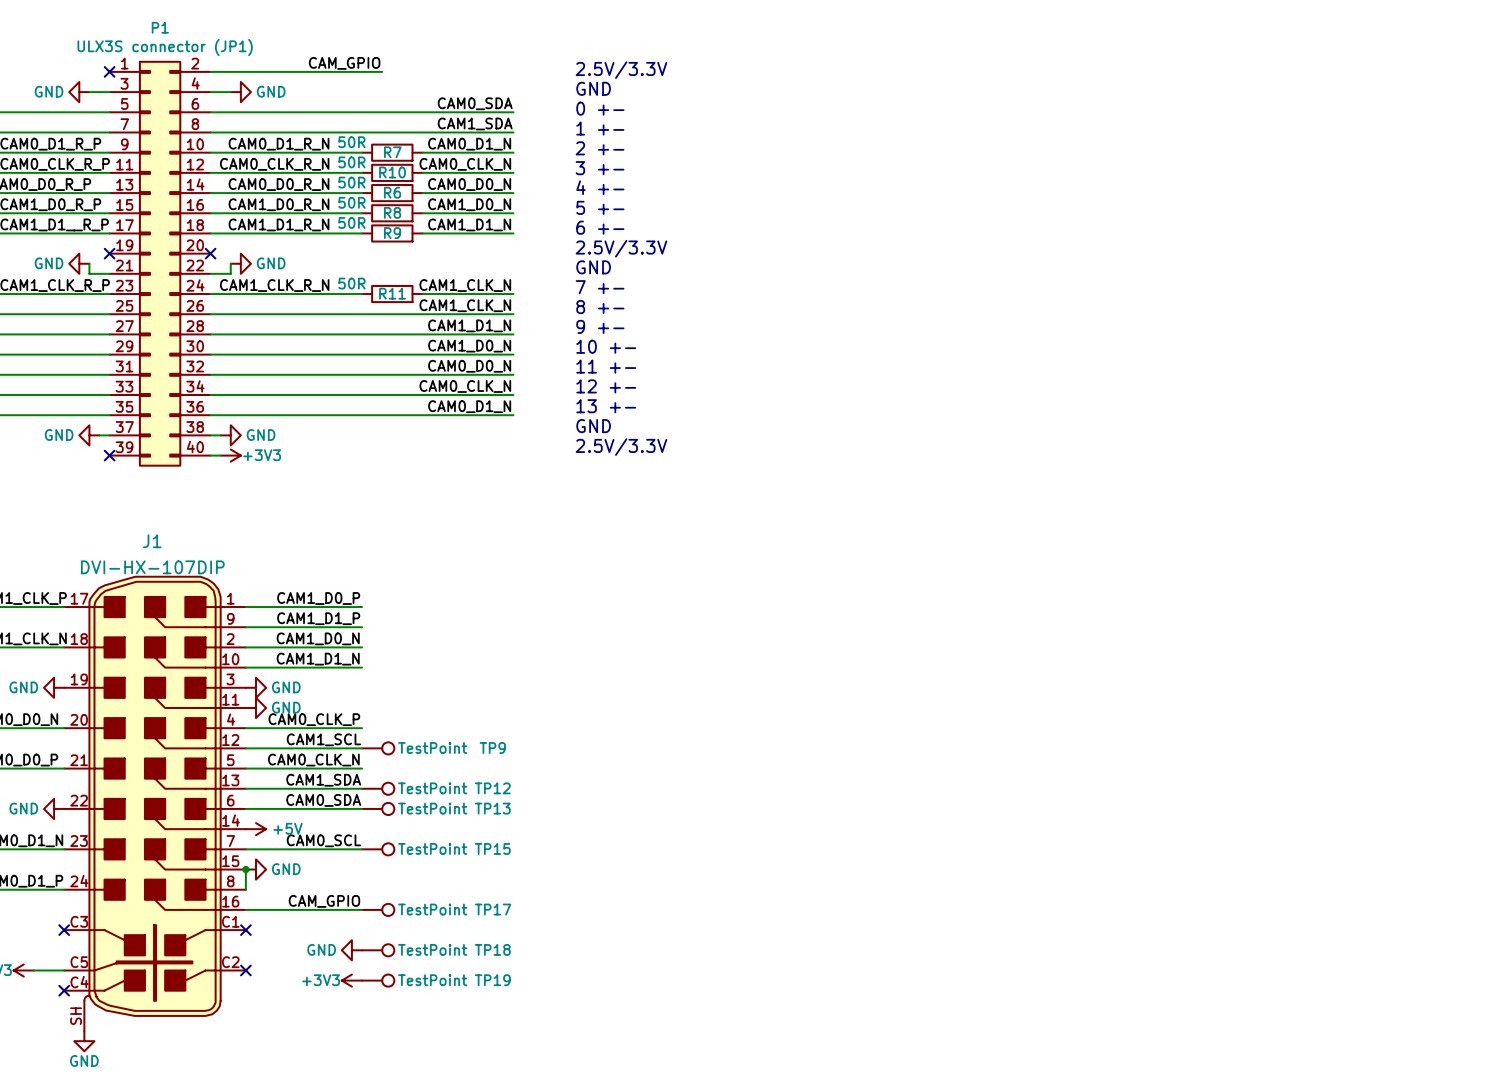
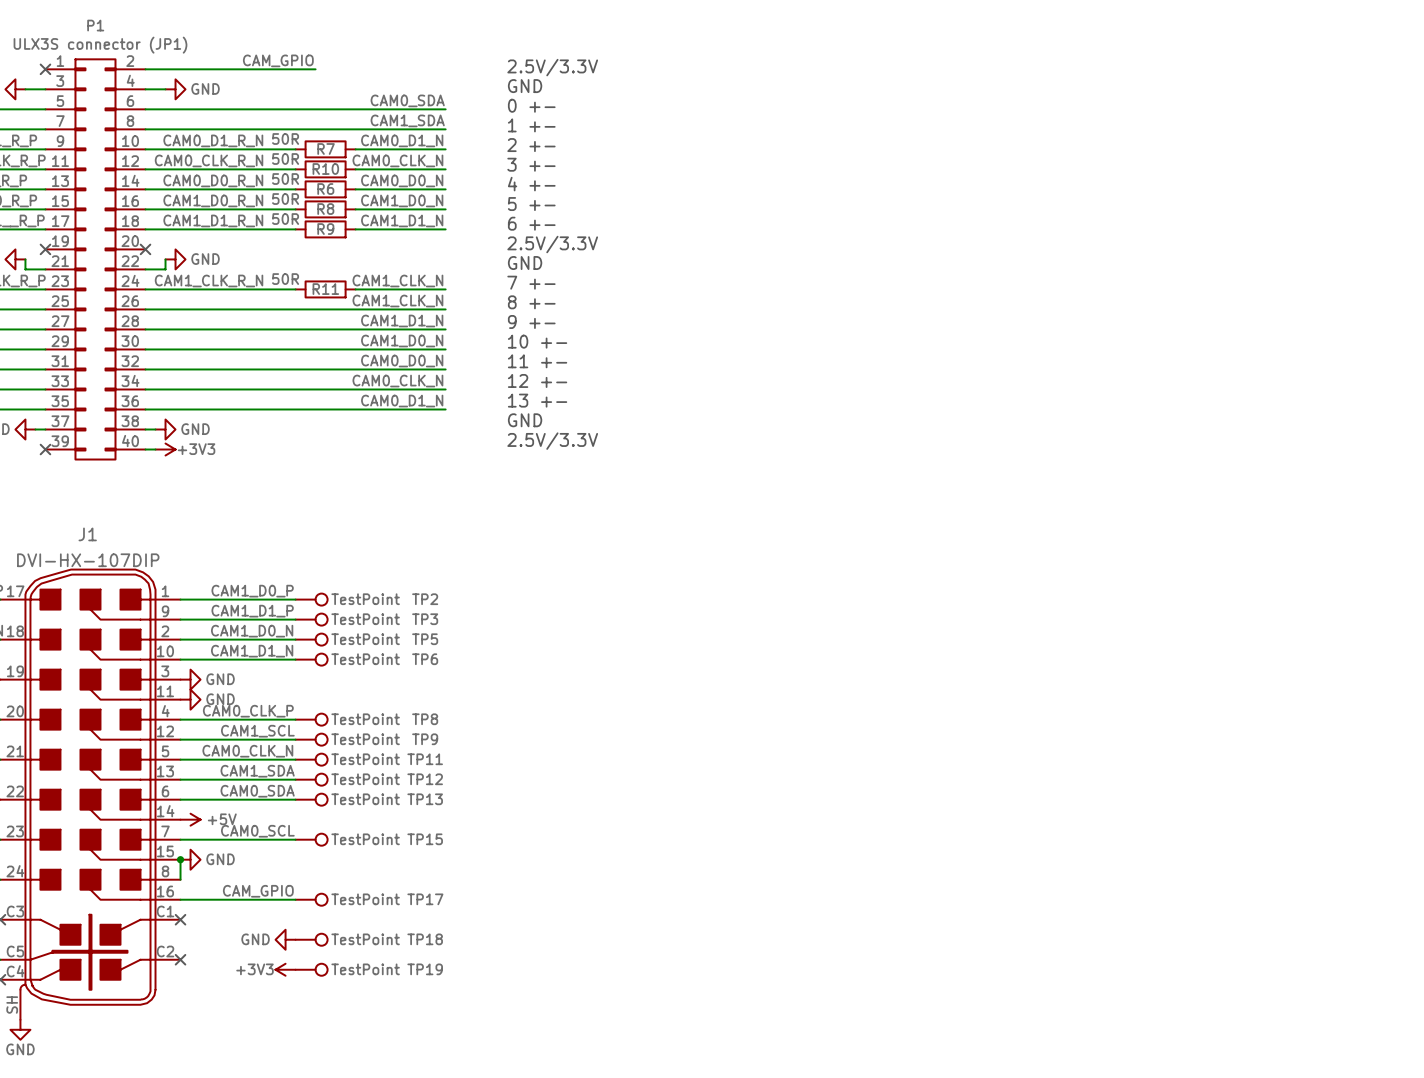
TP2: none -> TestPoint (311, 599)
TP3: none -> TestPoint (311, 619)
TP5: none -> TestPoint (311, 639)
TP6: none -> TestPoint (311, 659)
TP8: none -> TestPoint (311, 719)
TP11: none -> TestPoint (311, 759)

